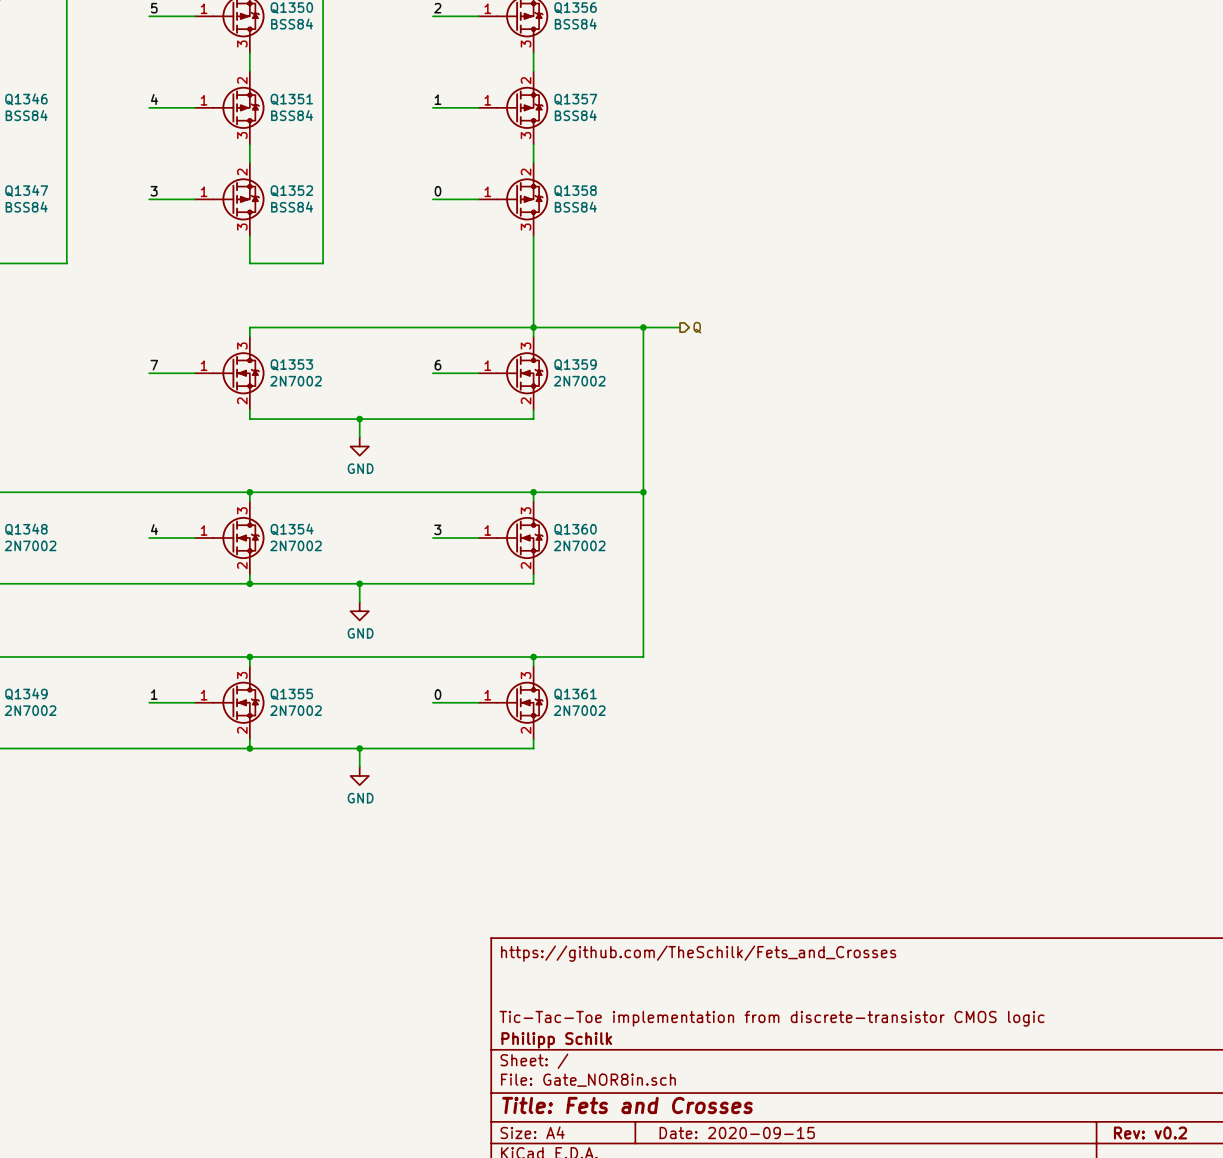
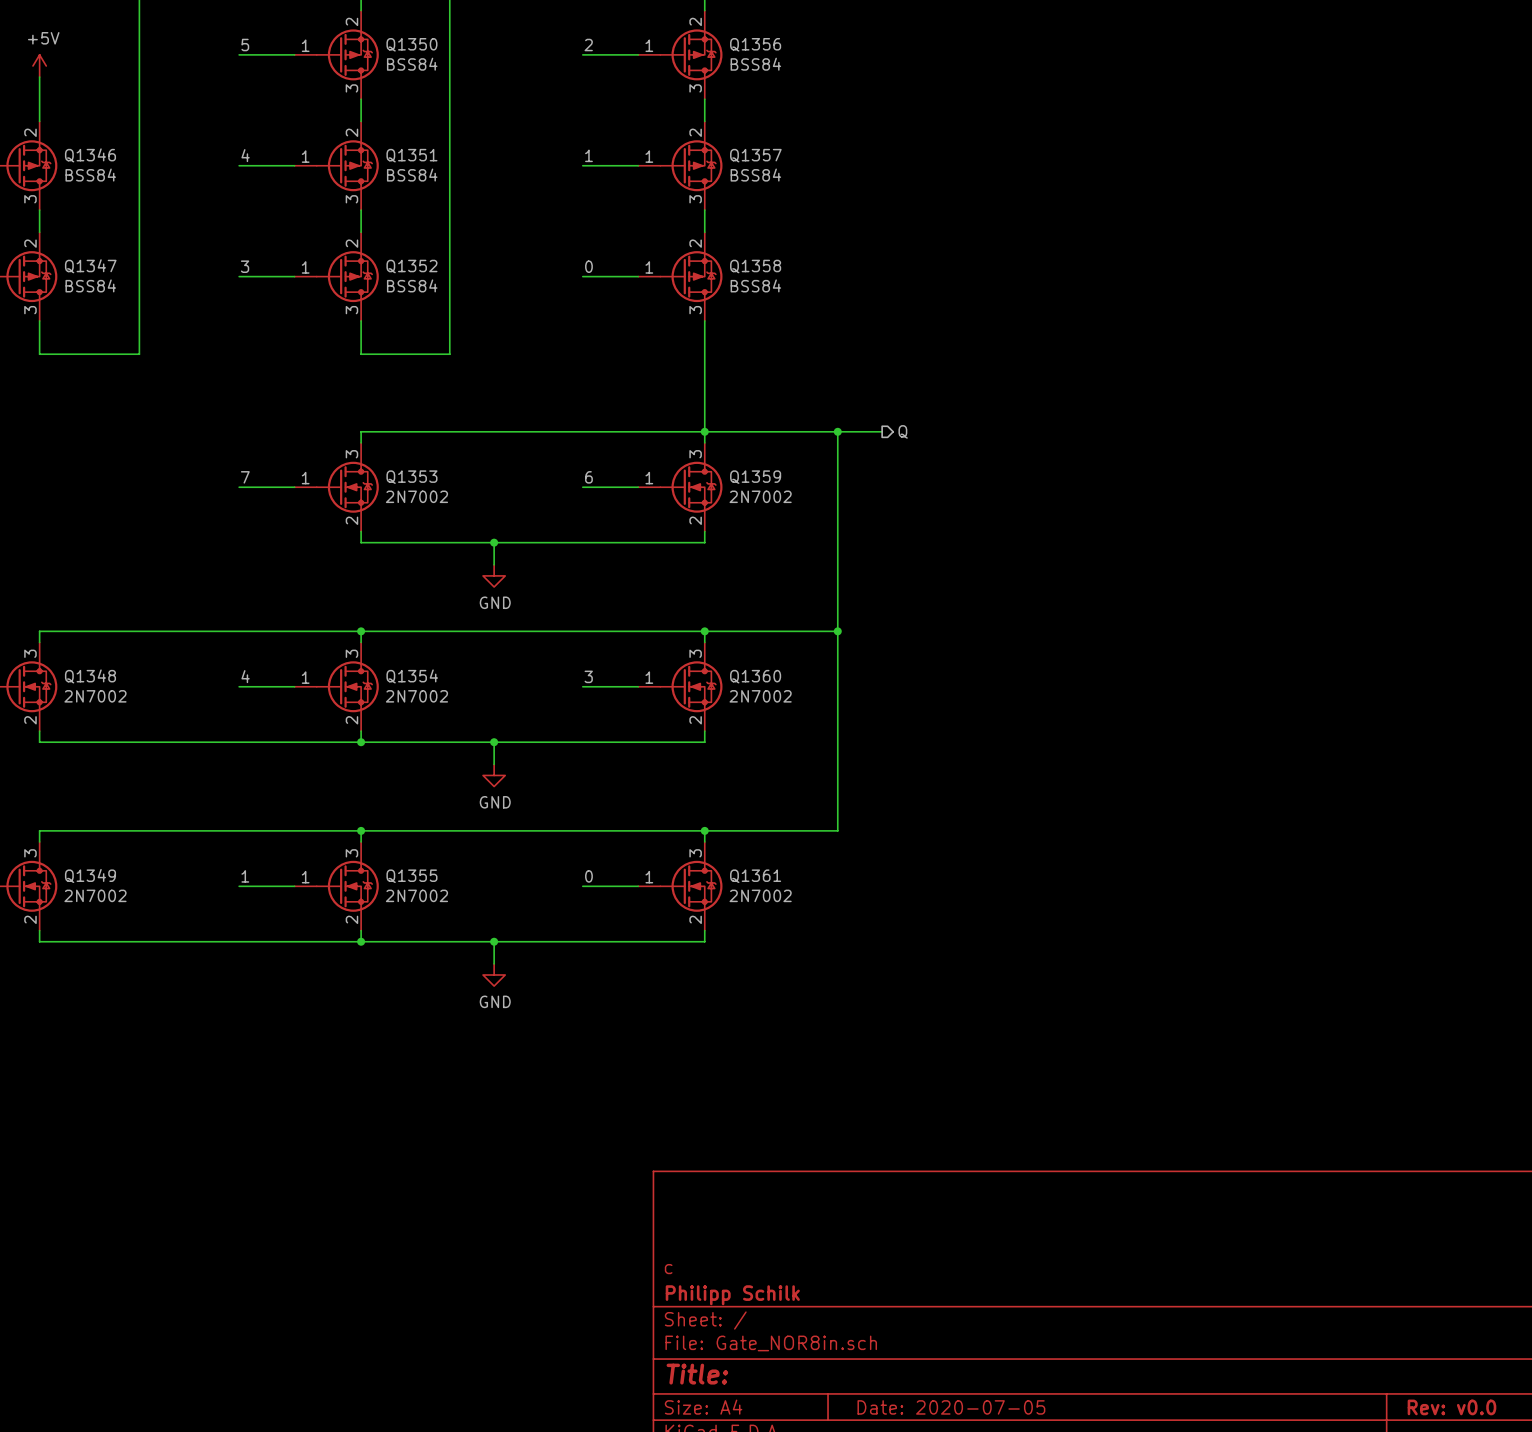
title block: https://github.com/TheSchilk/Fets_and_Crosses (698, 953) -> none
title block: Tic-Tac-Toe implementation from discrete-transistor CMOS logic (771, 1018) -> c (668, 1269)
title block: Title: Fets and Crosses (627, 1105) -> Title: (697, 1374)
title block: Date: 2020-09-15 (737, 1133) -> Date: 2020-07-05 (951, 1407)
title block: Rev: v0.2 (1150, 1133) -> Rev: v0.0 (1451, 1407)

